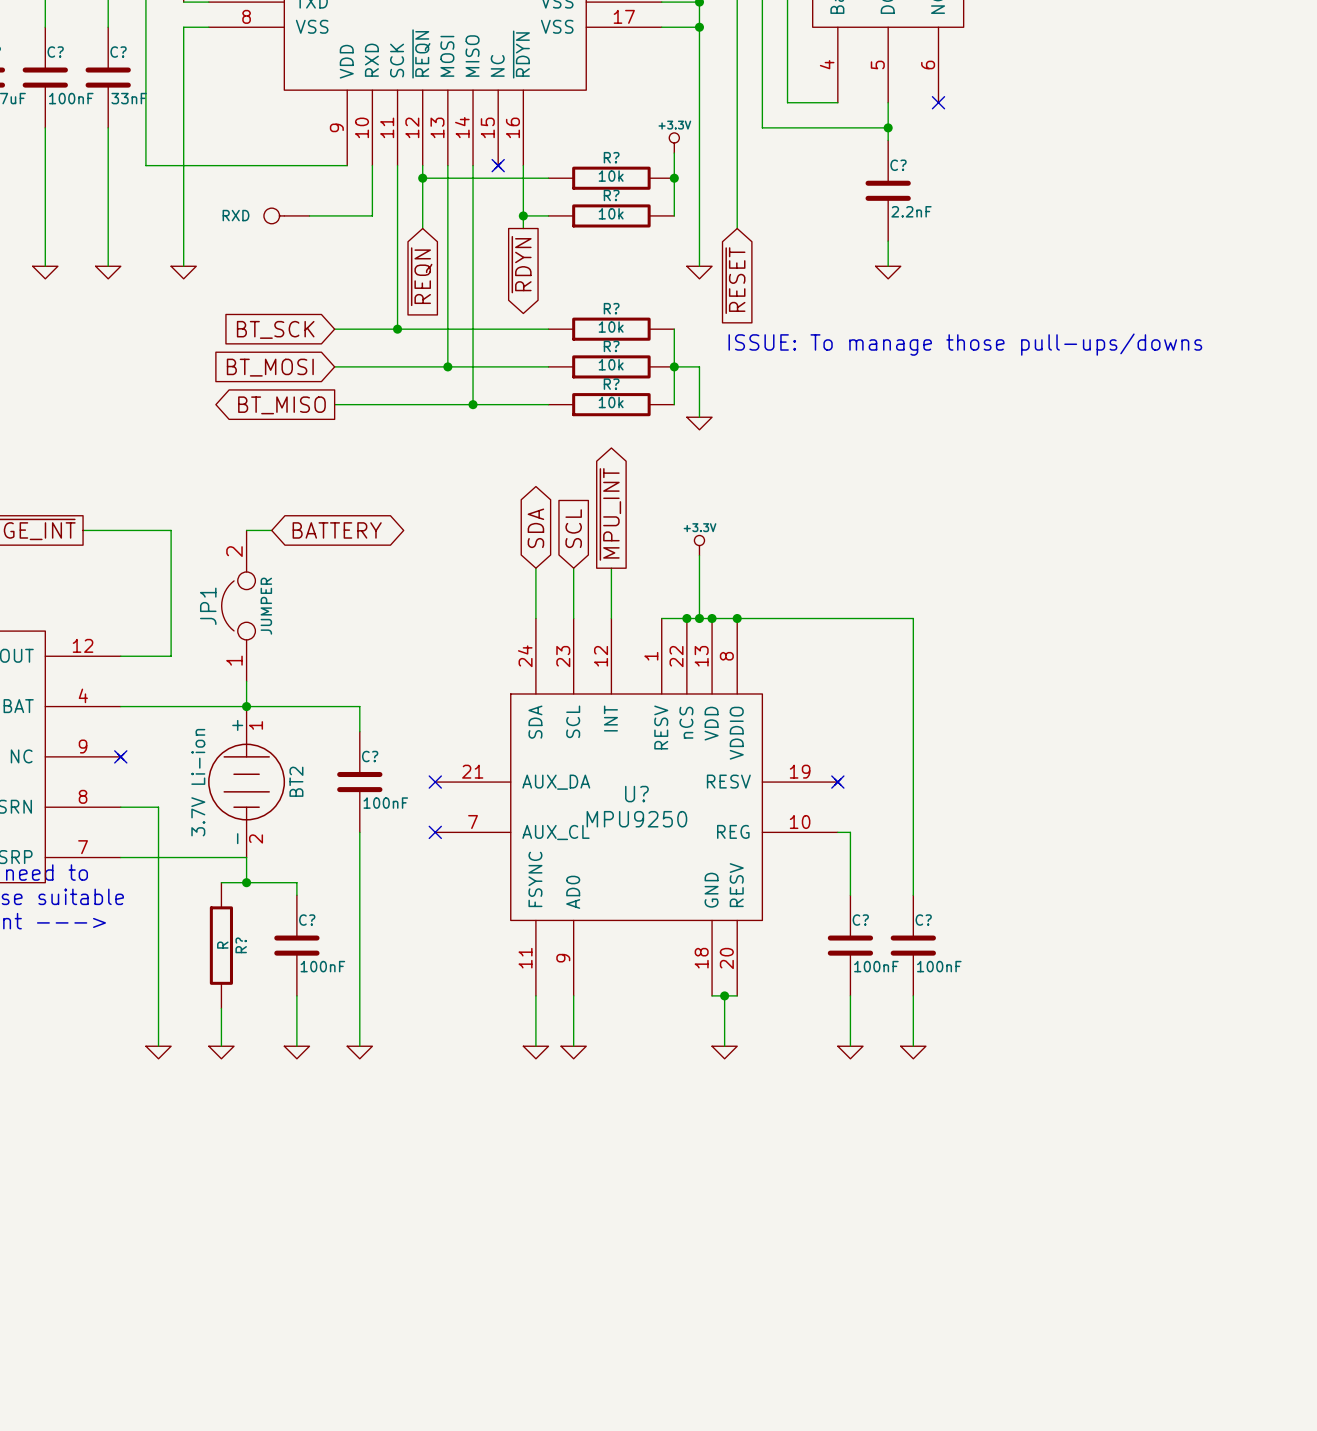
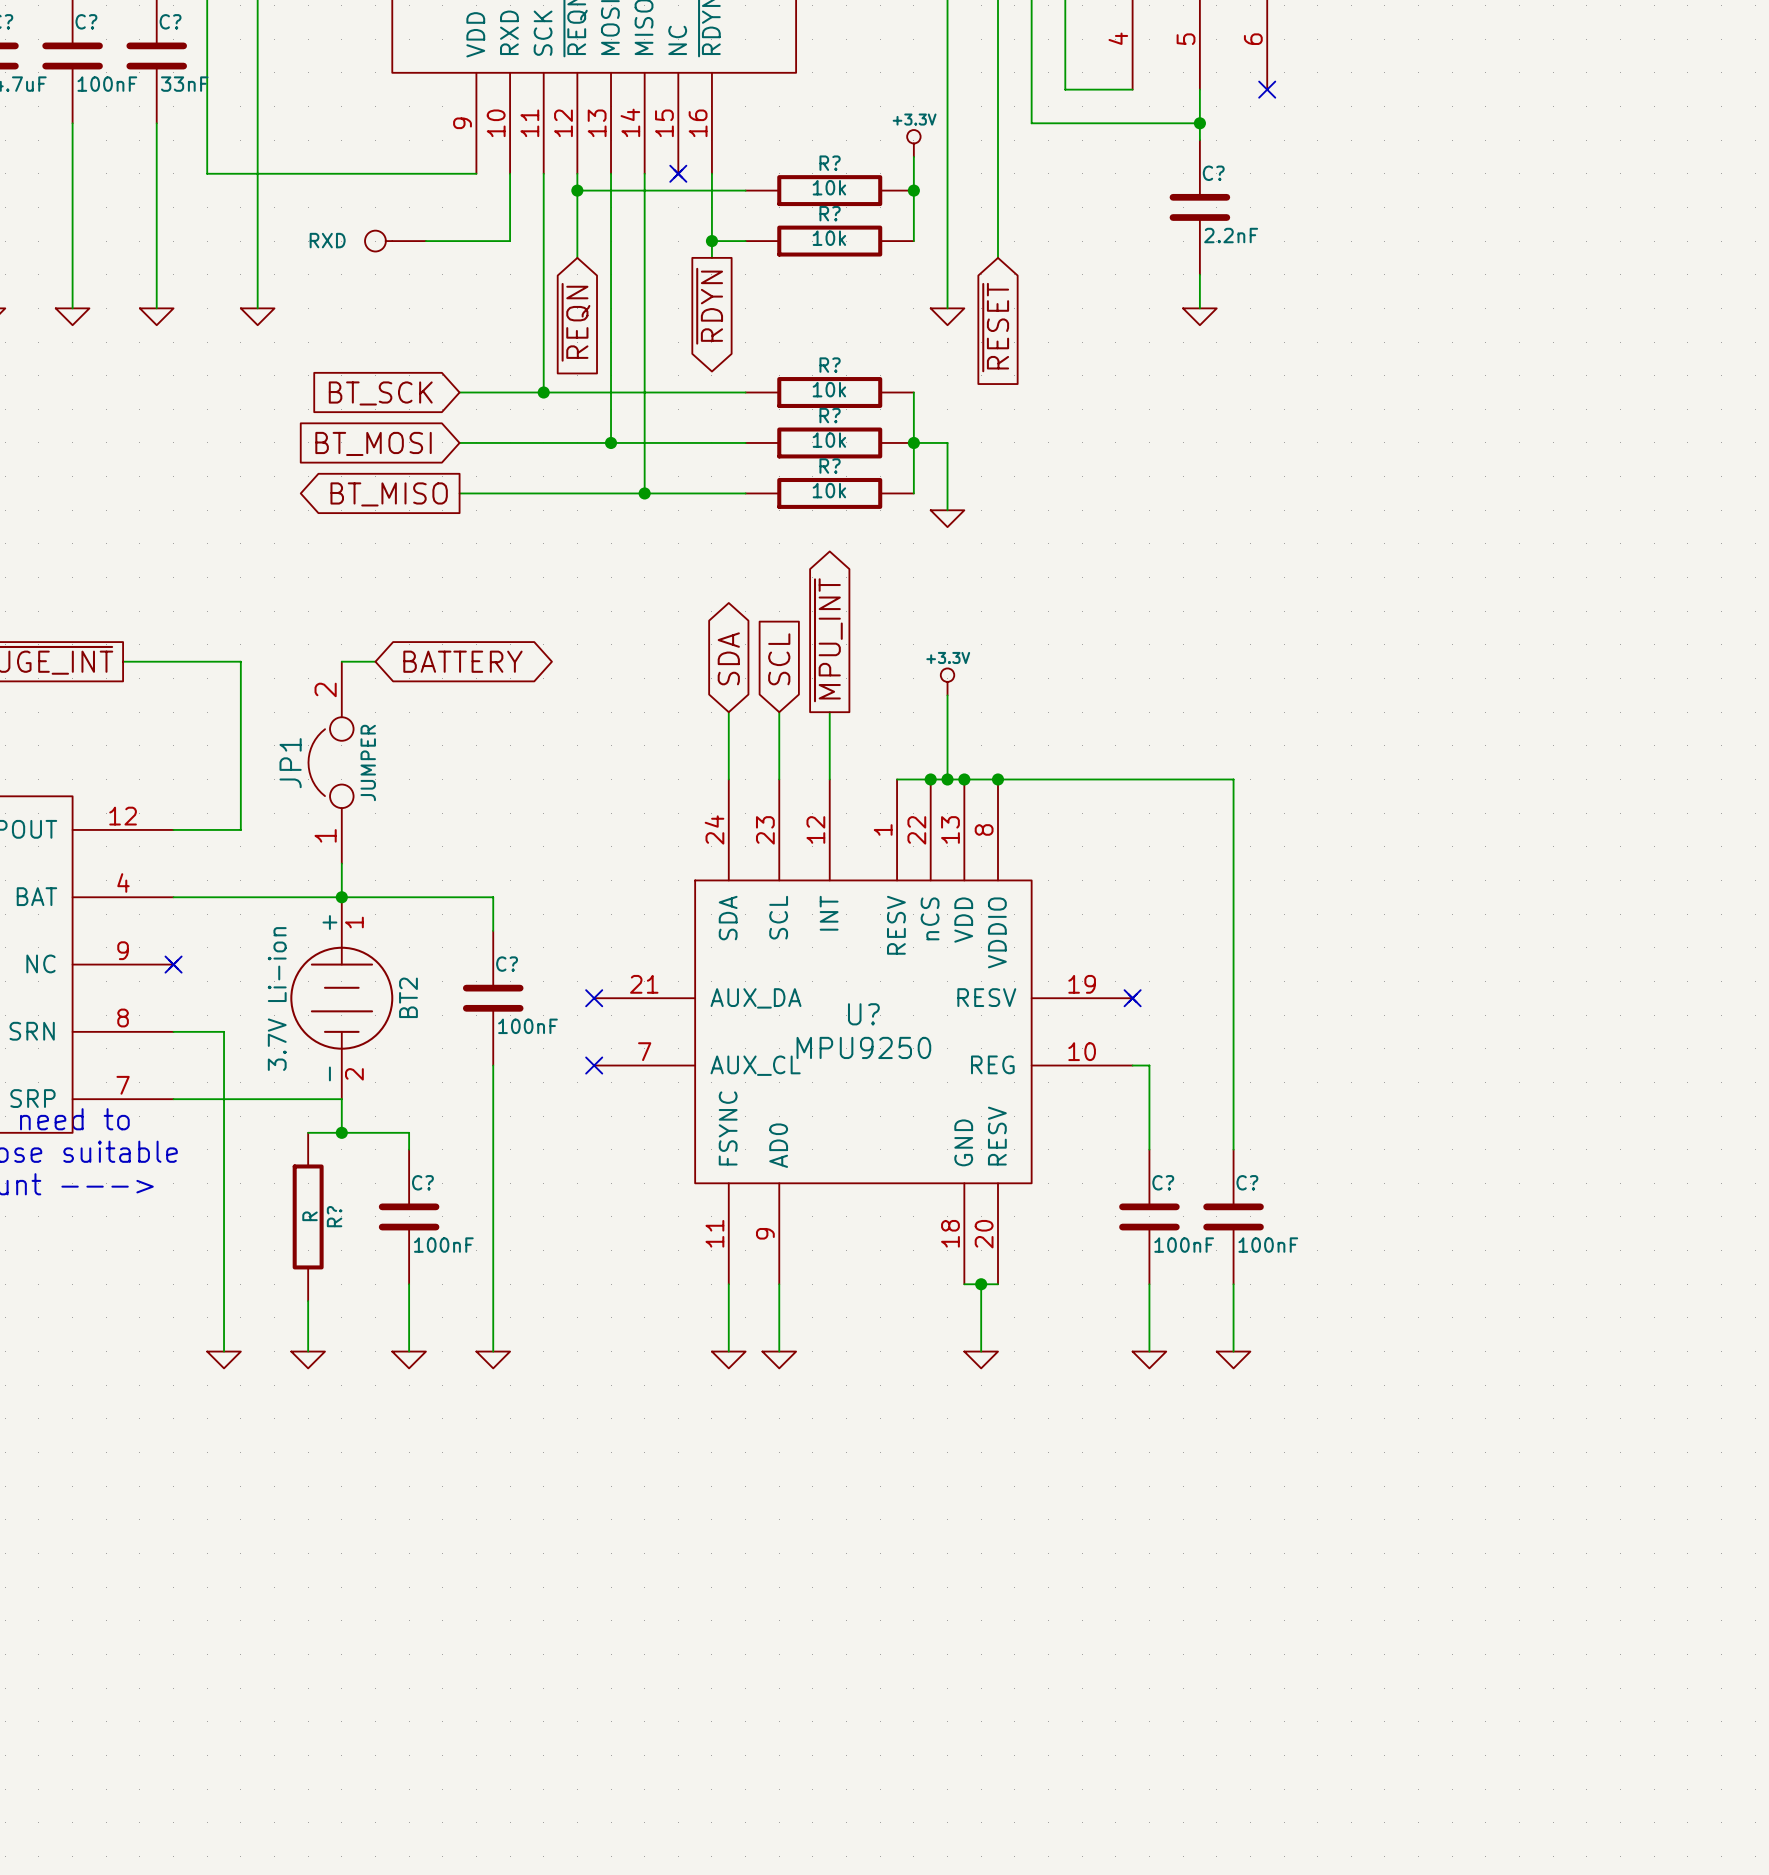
text: ISSUE: To manage those pull-ups/downs (965, 344) -> none

